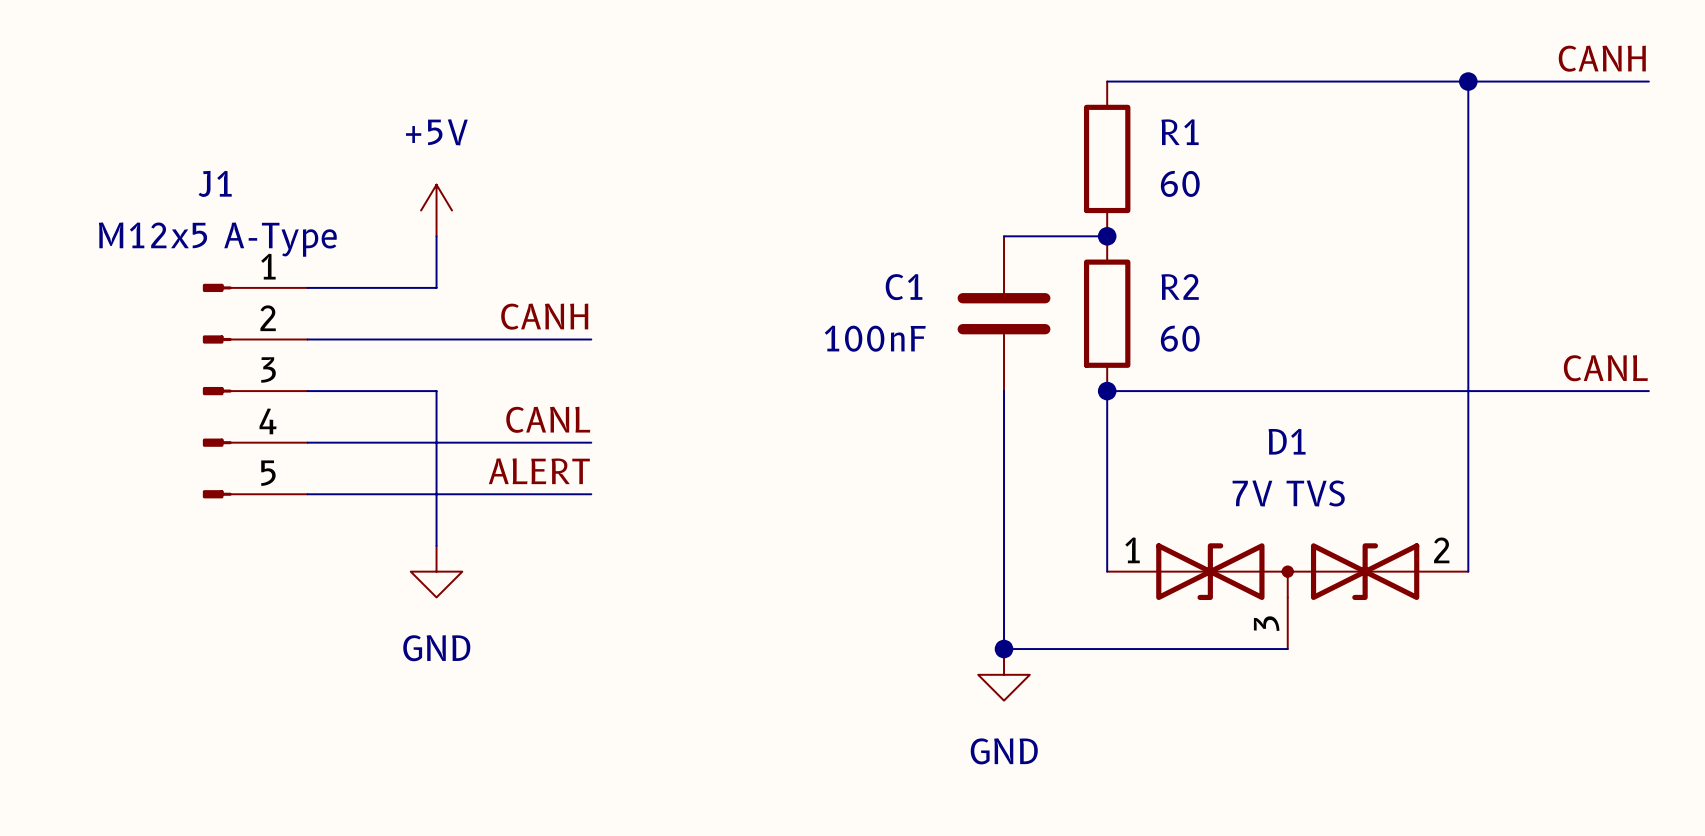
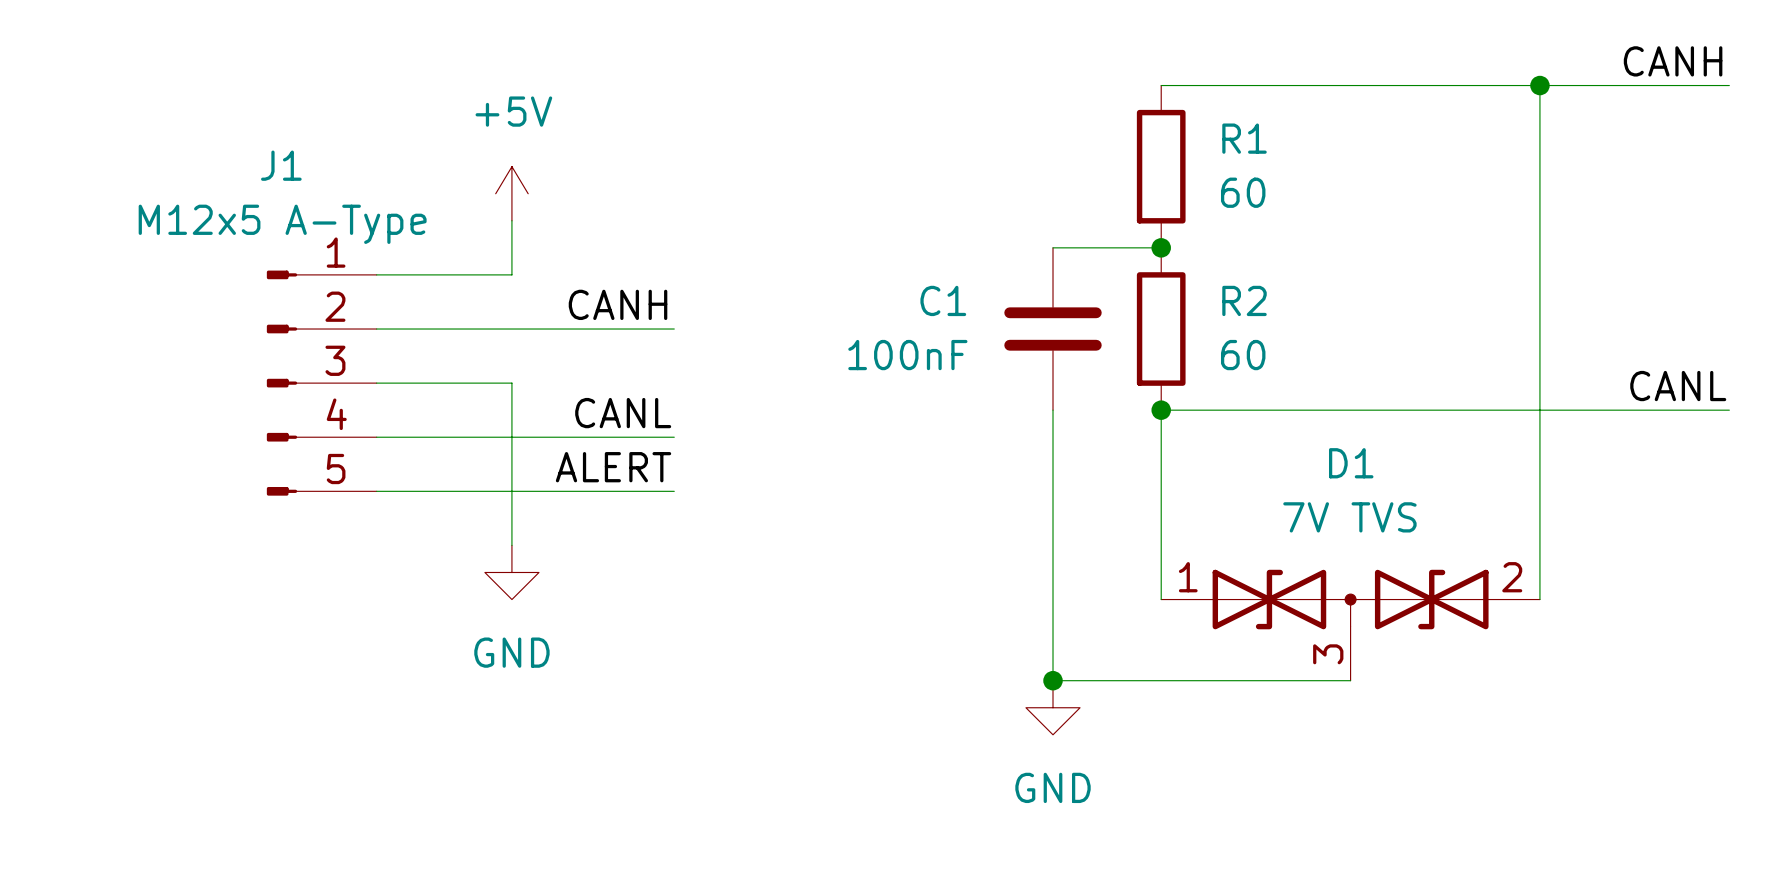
power symbol position: +5V (436, 210) -> +5V (511, 193)
wire: (436, 236) (436, 287) (307, 287) -> (511, 220) (511, 274) (376, 274)
label position: CANH (544, 316) -> CANH (618, 304)
wire: (307, 339) (591, 339) -> (376, 329) (674, 329)
J1 position: (255, 391) -> (321, 383)
wire: (307, 391) (436, 391) (436, 545) -> (376, 383) (511, 383) (511, 545)
label position: CANL (548, 419) -> CANL (623, 413)
wire: (307, 442) (591, 442) -> (376, 437) (674, 437)
label position: ALERT (539, 471) -> ALERT (613, 467)
wire: (307, 494) (591, 494) -> (376, 491) (674, 491)
power symbol position: GND (436, 571) -> GND (511, 572)

